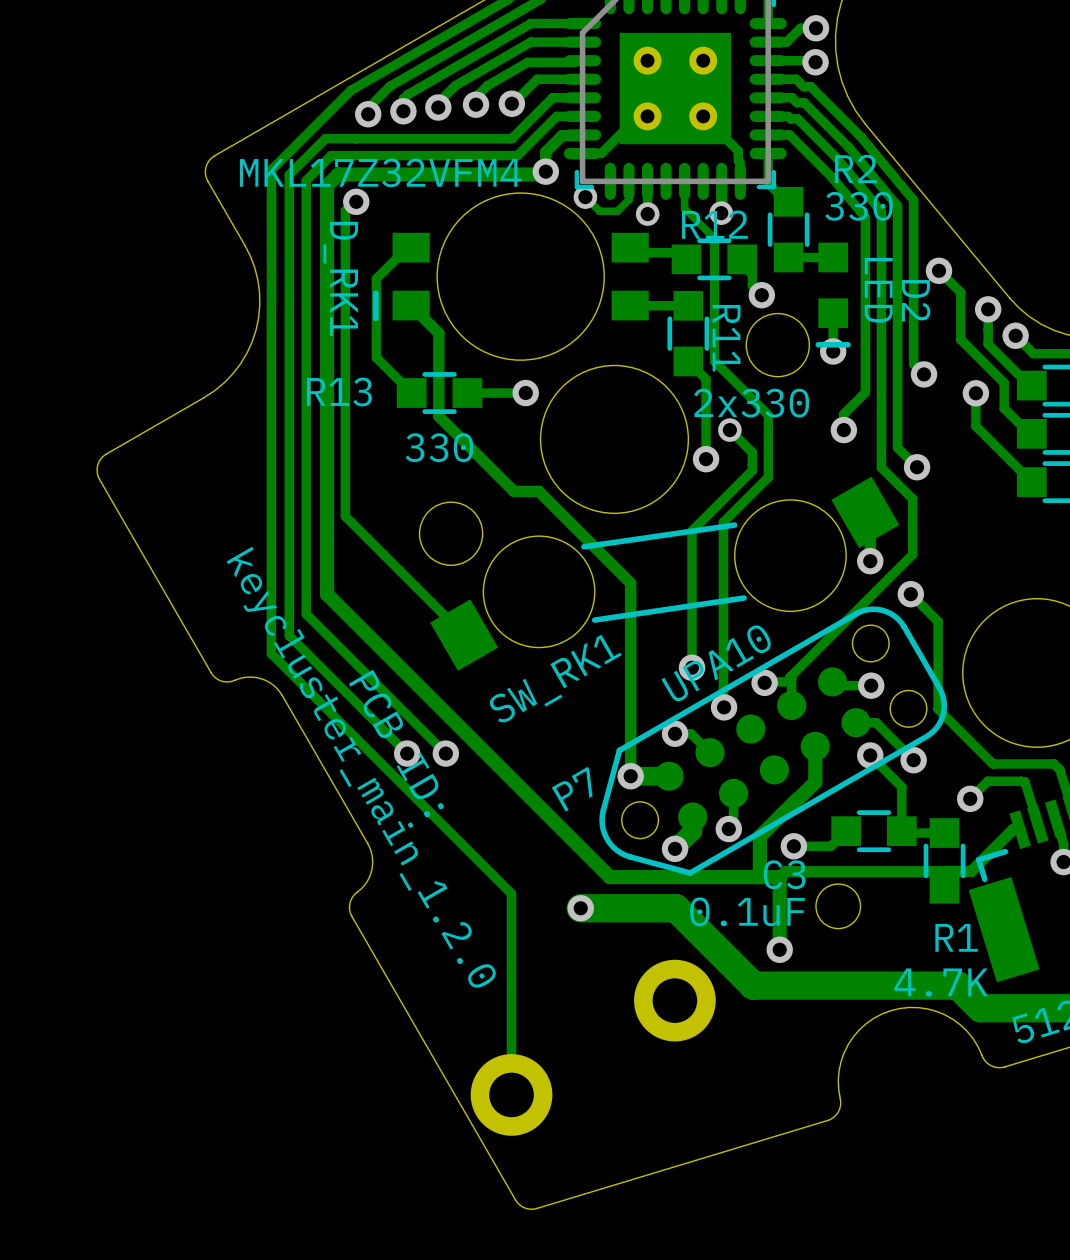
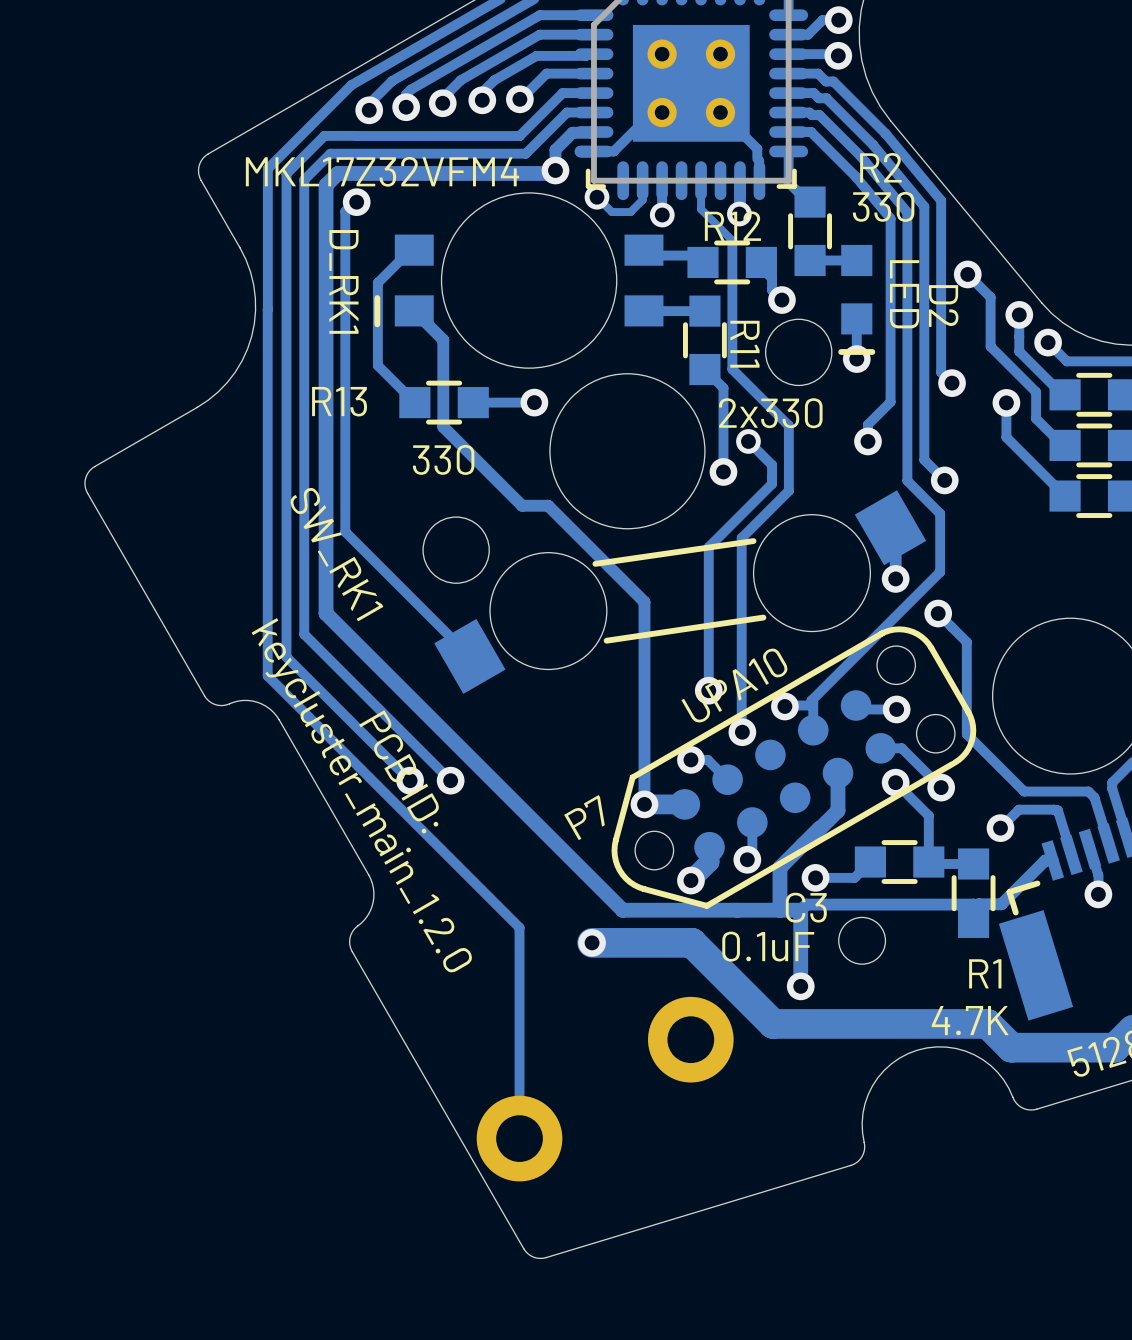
SW_RK1 name rotation: 0° (555, 678) -> 90° clockwise (336, 554)
SW_RK1 name position: SW_RK1 (555, 678) -> SW_RK1 (336, 554)

